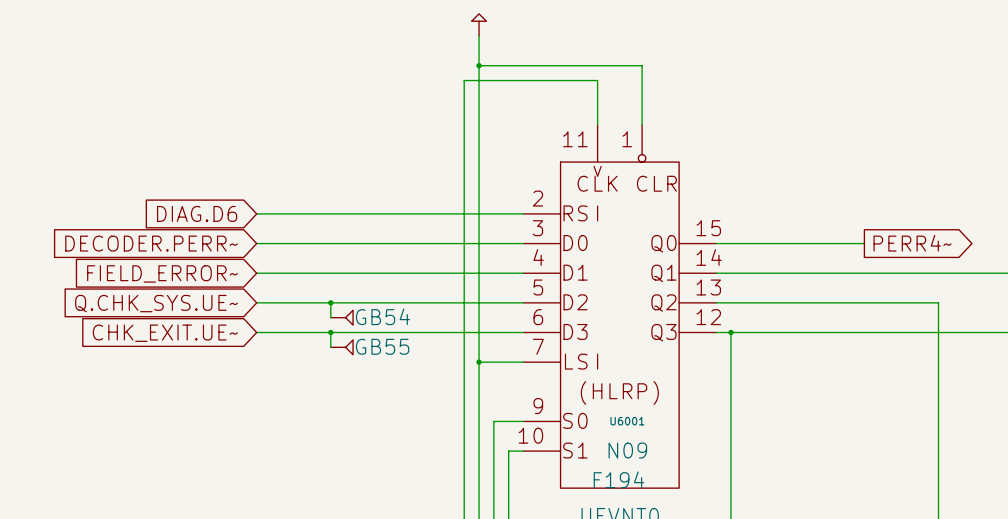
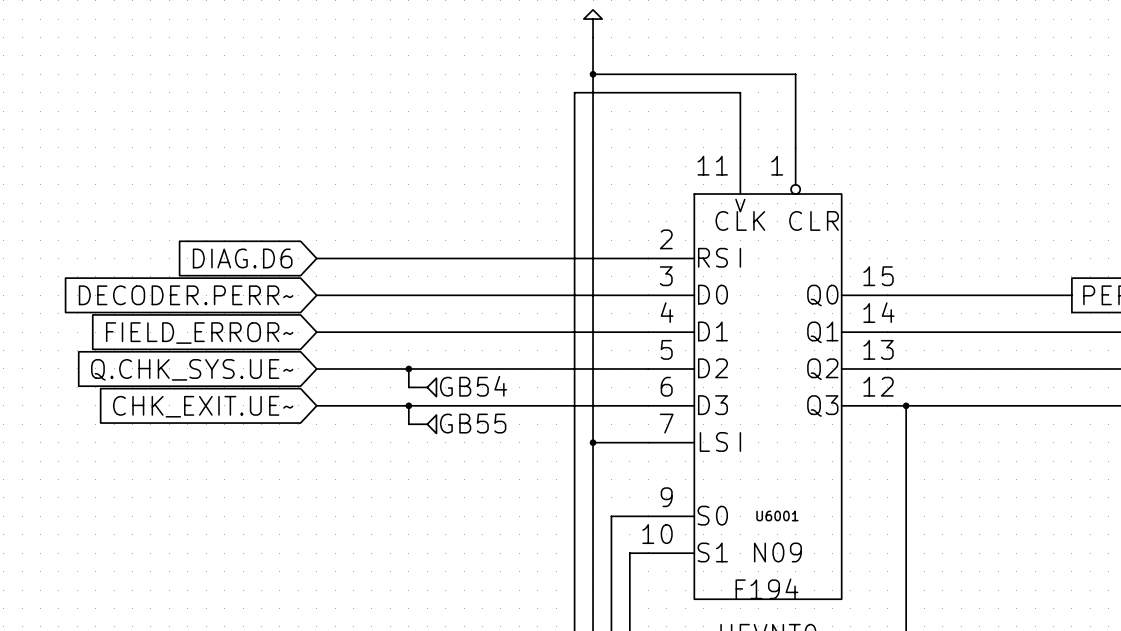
U6001 text: H (597, 391) -> none
U6001 text: L (613, 391) -> none
U6001 text: R (627, 391) -> none
U6001 text: P (642, 391) -> none
U6001 text: ( (583, 393) -> none
U6001 text: ) (656, 393) -> none

